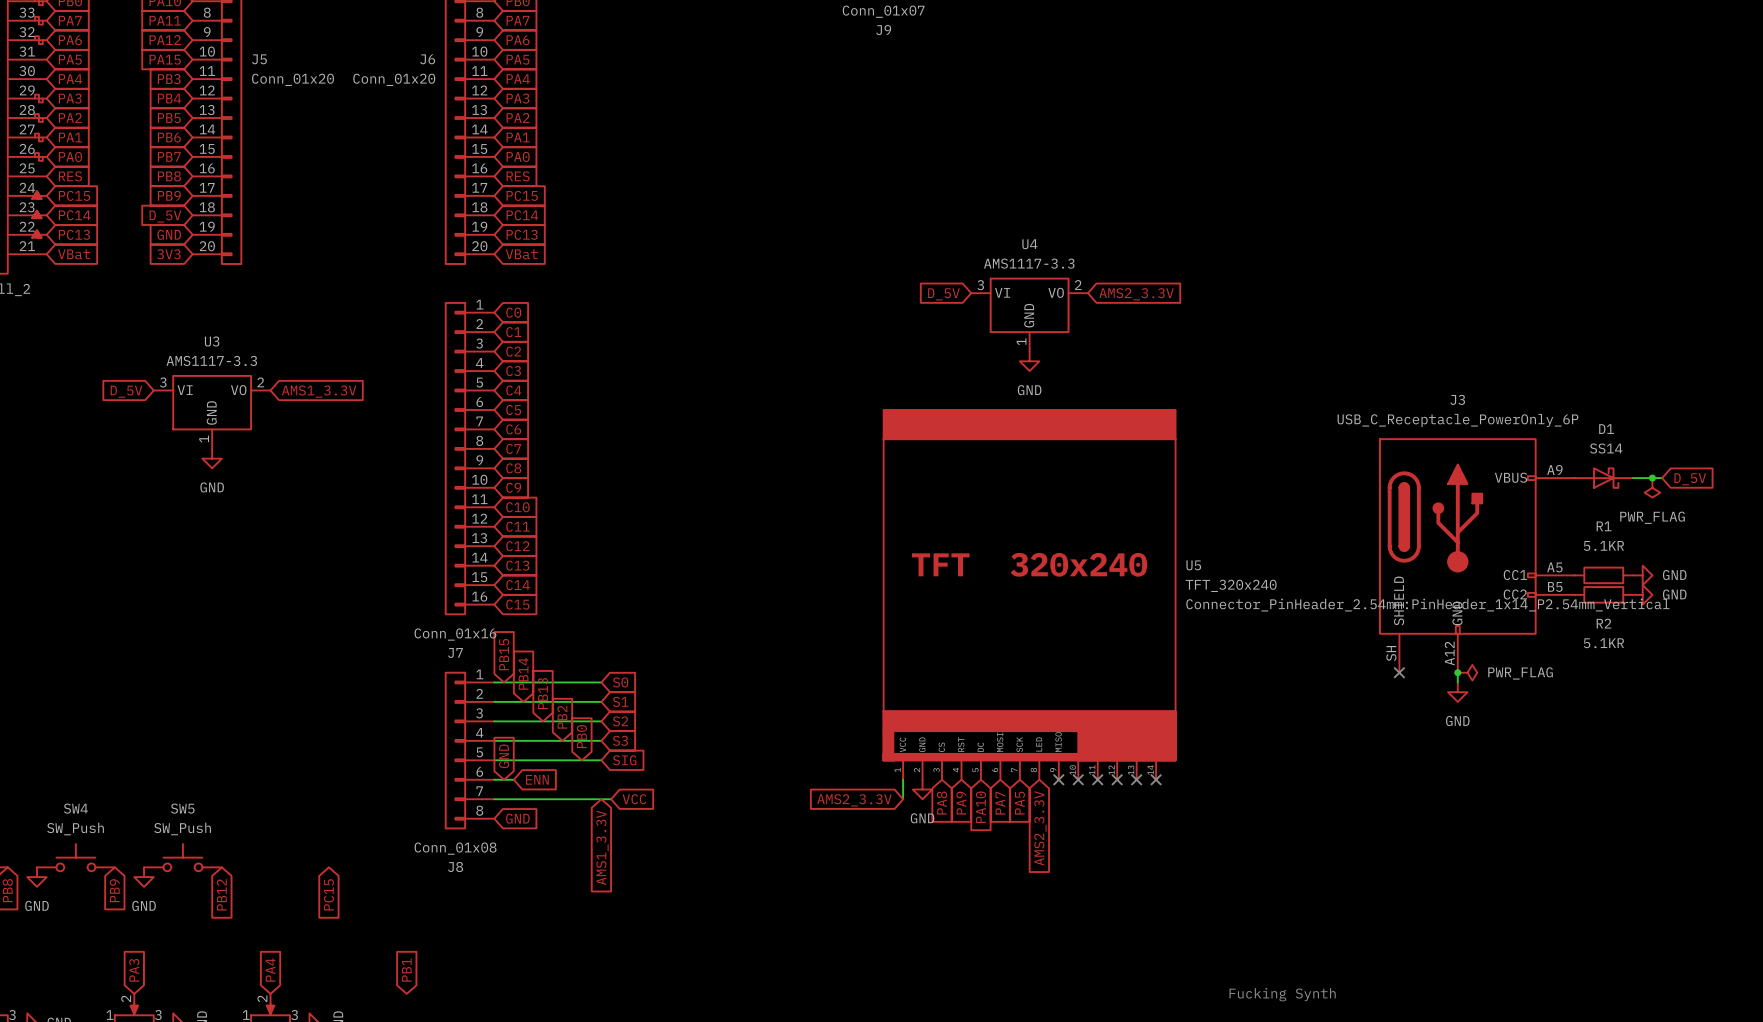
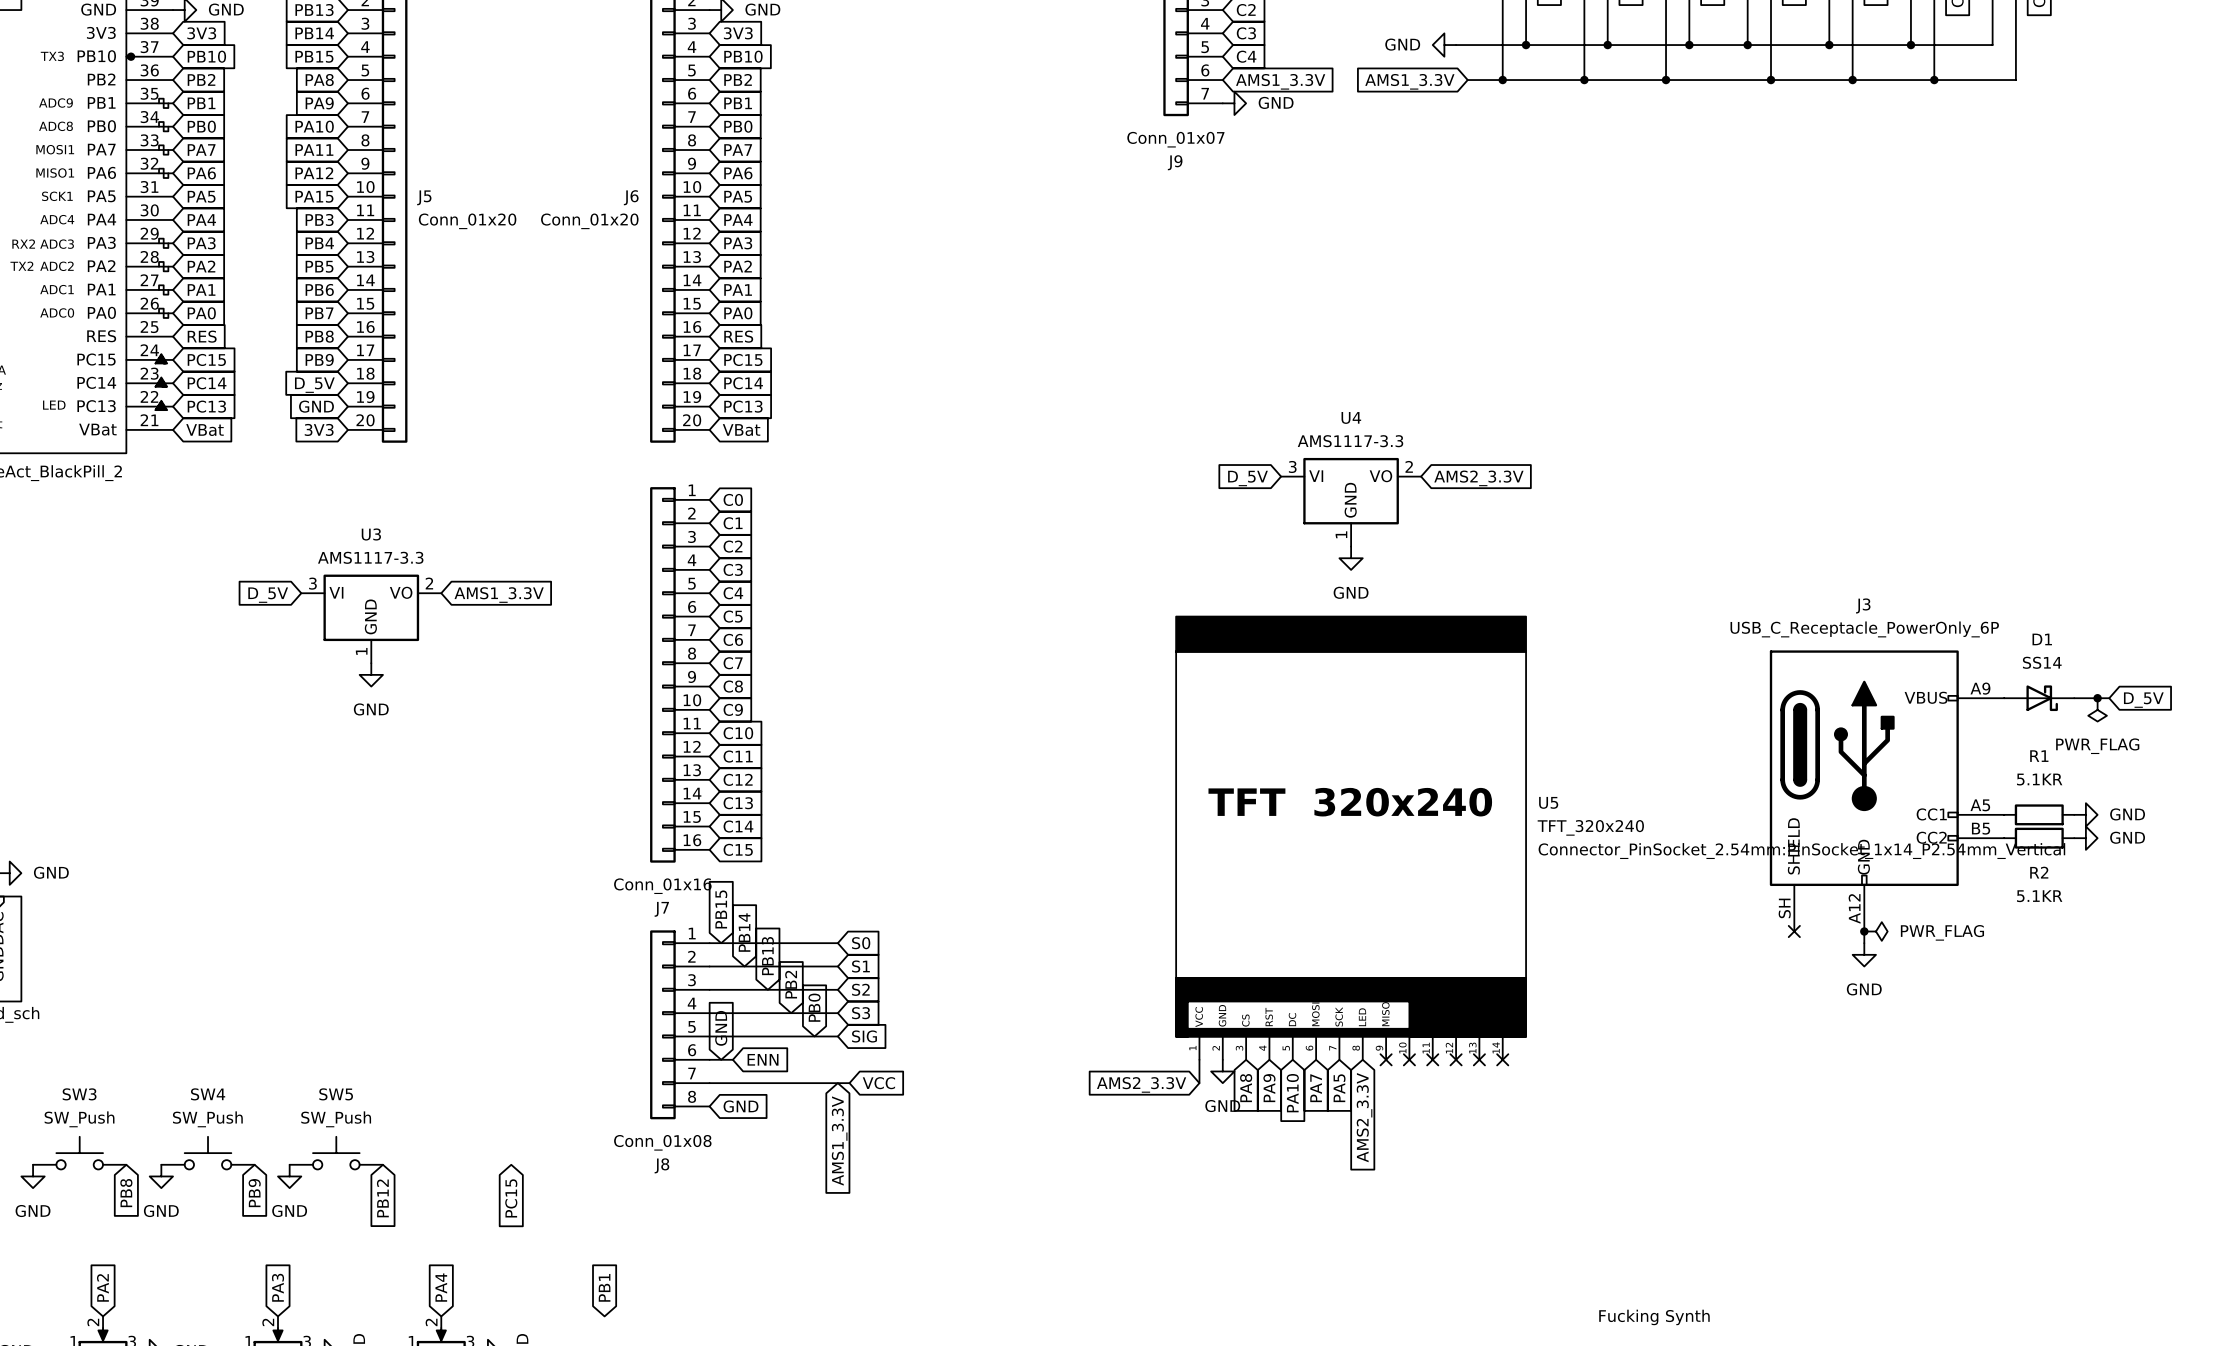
U5 text: Connector_PinHeader_2.54mm:PinHeader_1x14_P2.54mm_Vertical (1427, 605) -> Connector_PinSocket_2.54mm:PinSocket_1x14_P2.54mm_Vertical (1801, 851)

